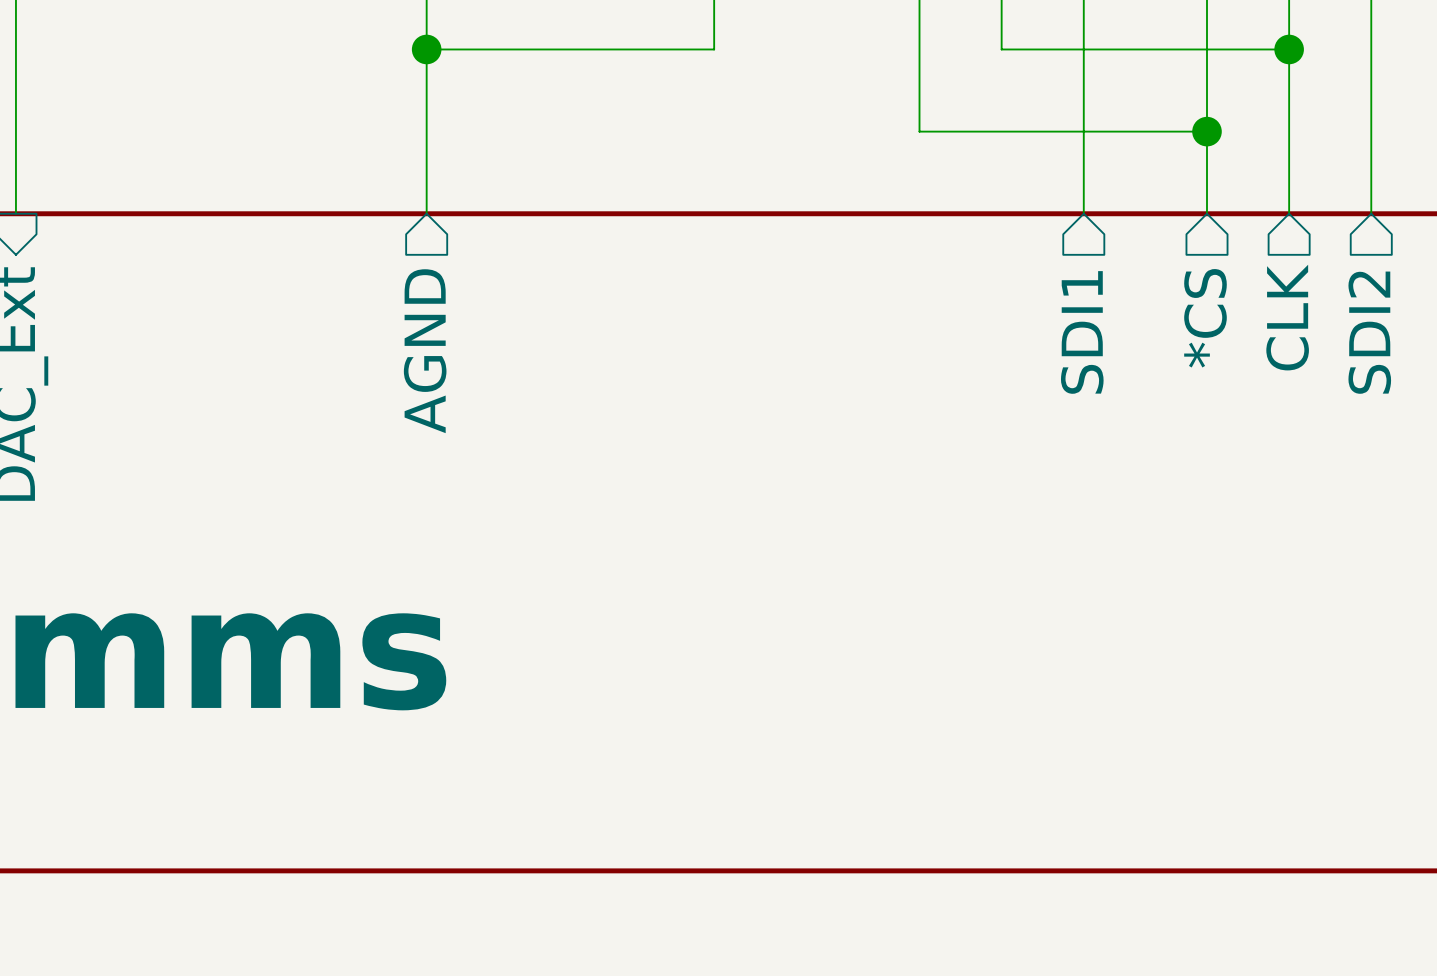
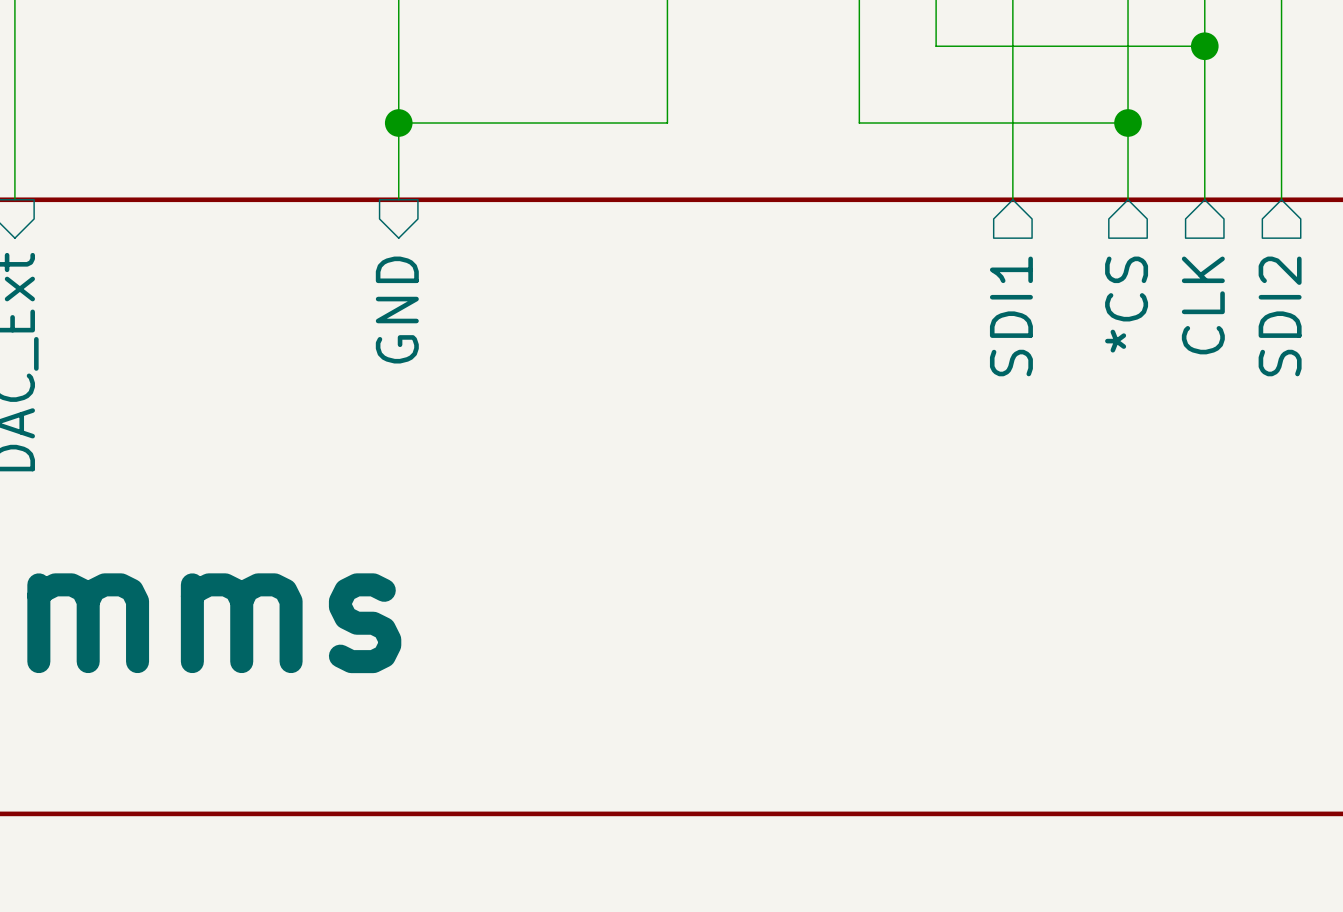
wire: (426, 49) (714, 49) -> (398, 123) (667, 123) (667, 46)
junction position: (426, 49) -> (398, 123)
sheet pin shape: output (425, 351) -> input (397, 310)
sheet pin: AGND (425, 351) -> GND (397, 310)

